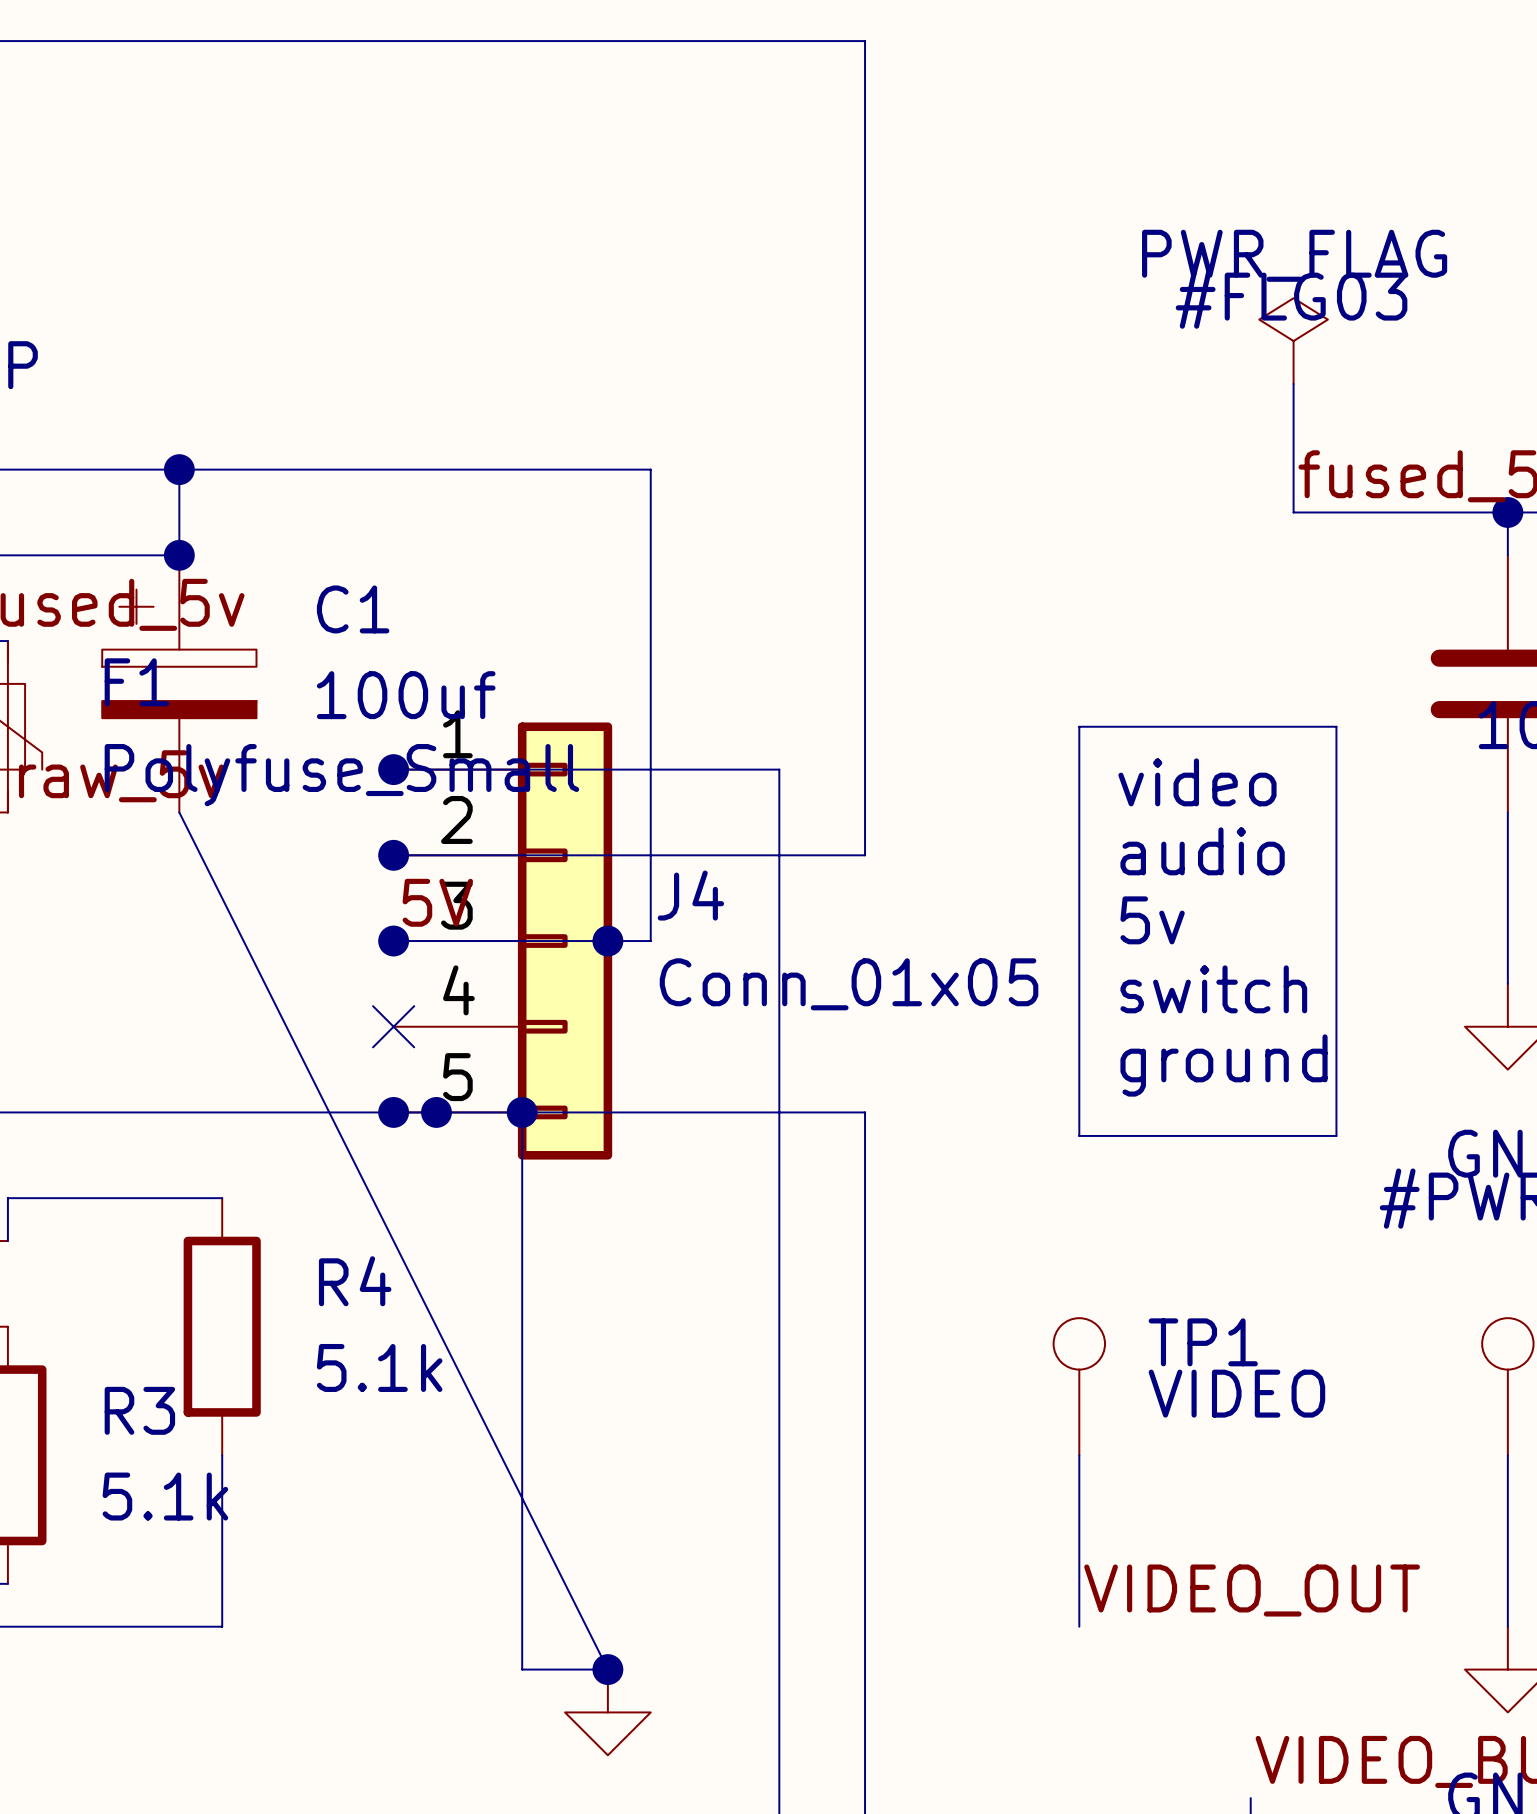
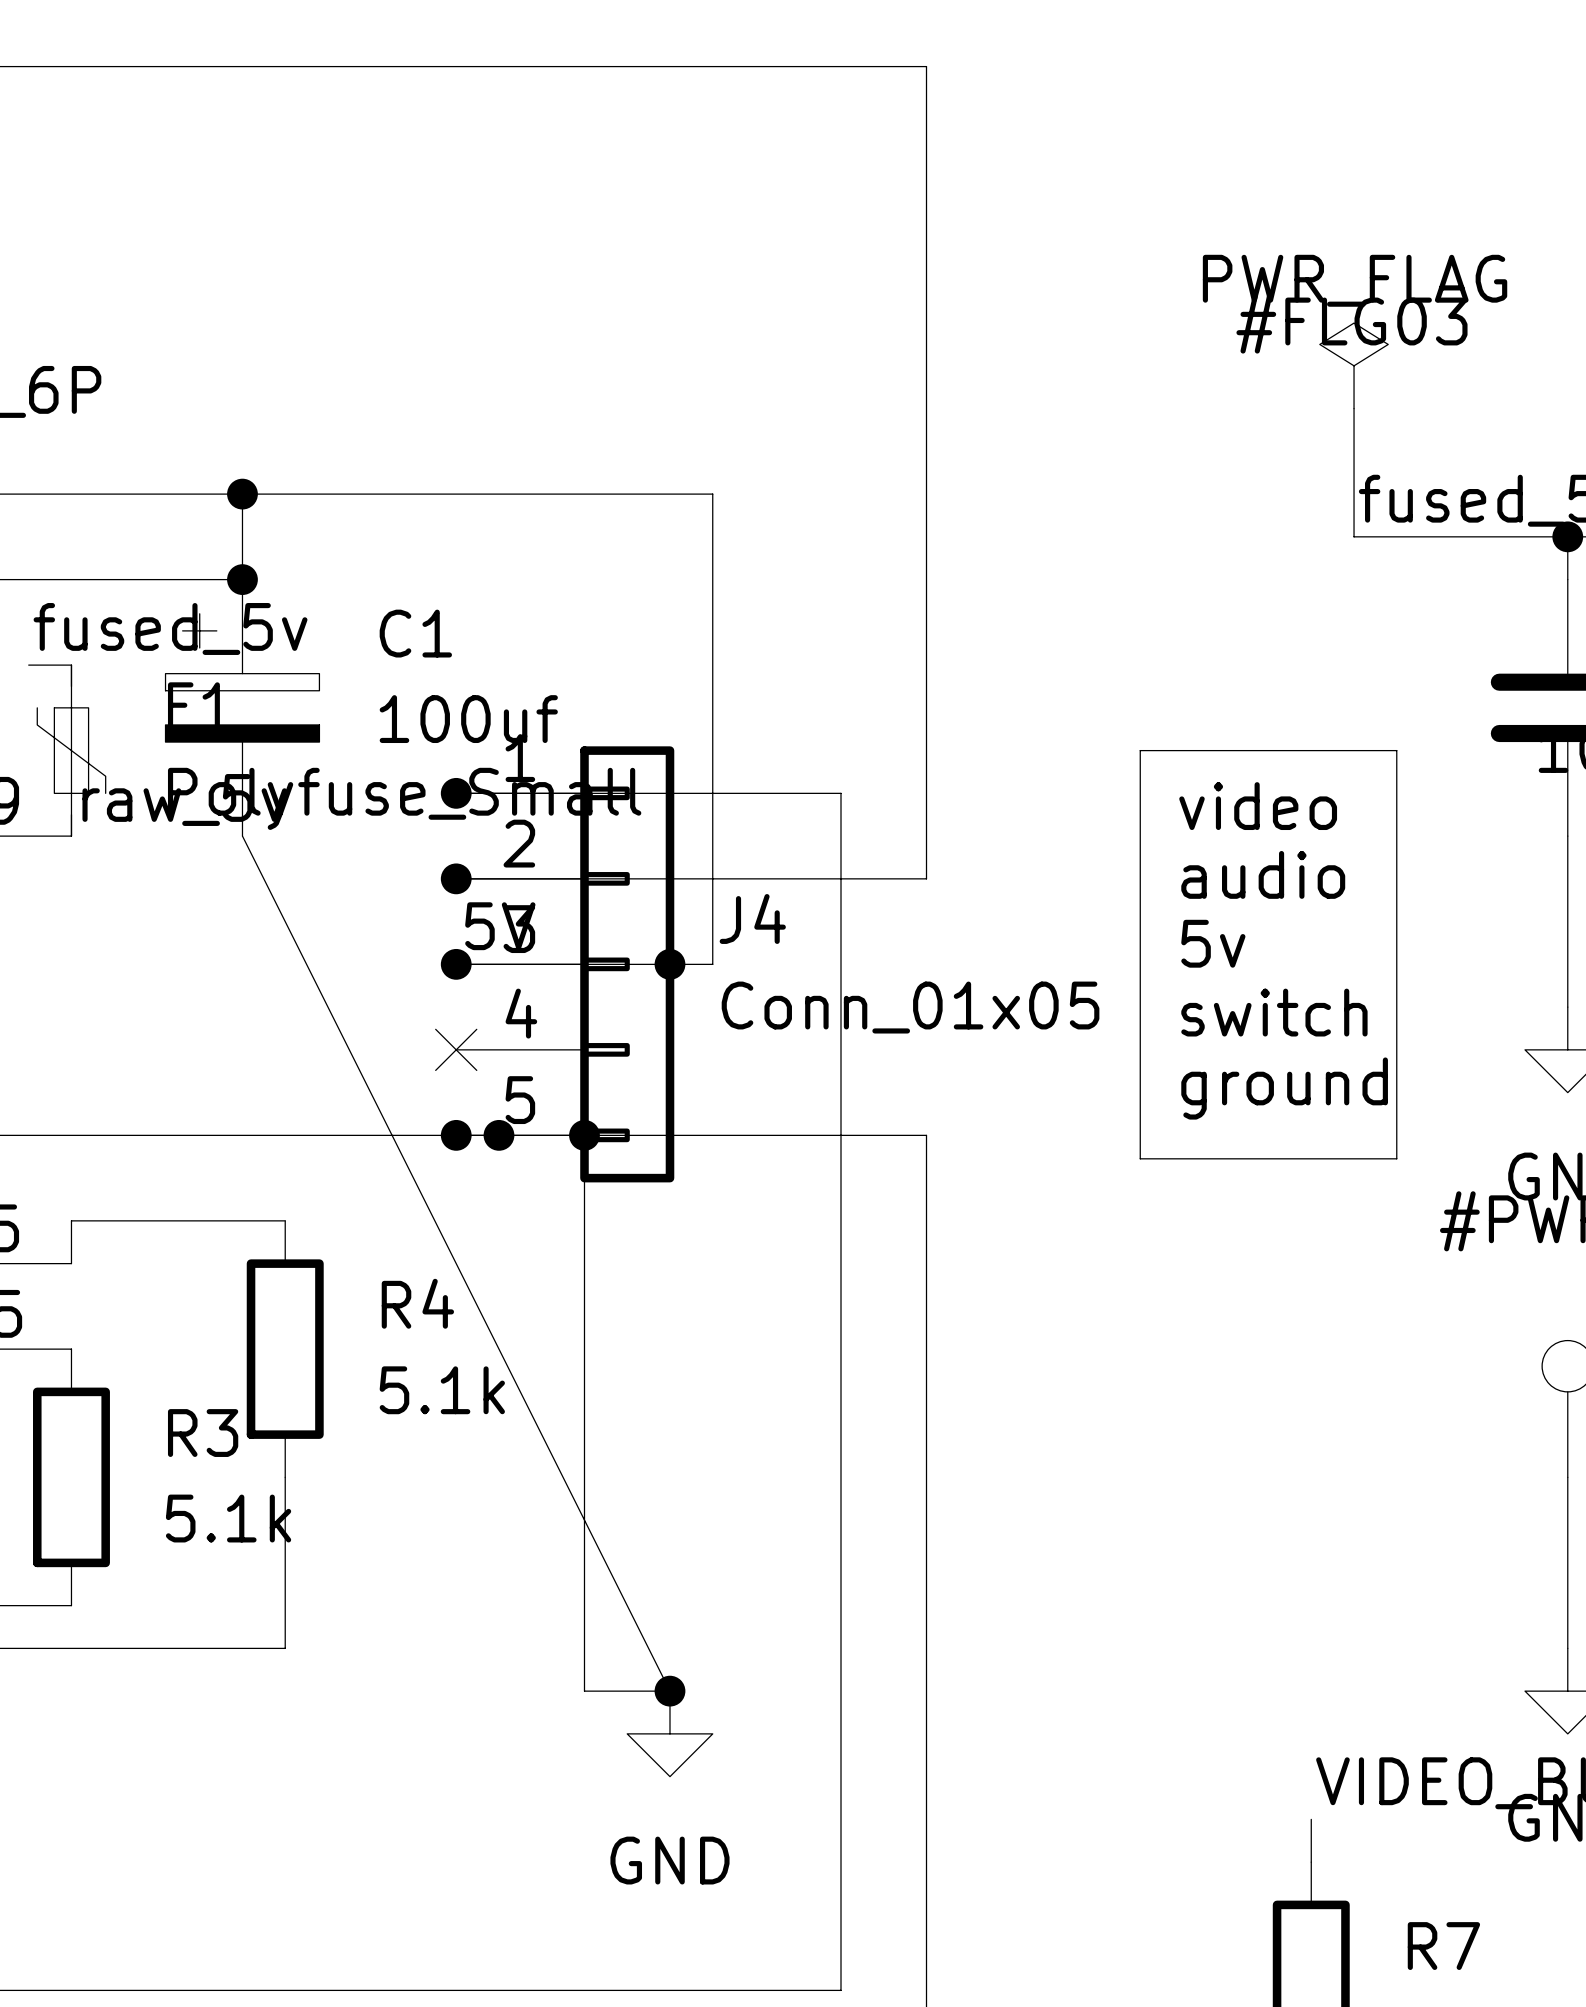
TP1: VIDEO (1079, 1386) -> none
wire: (1079, 1455) (1079, 1626) -> none
label: VIDEO_OUT (1252, 1590) -> none

